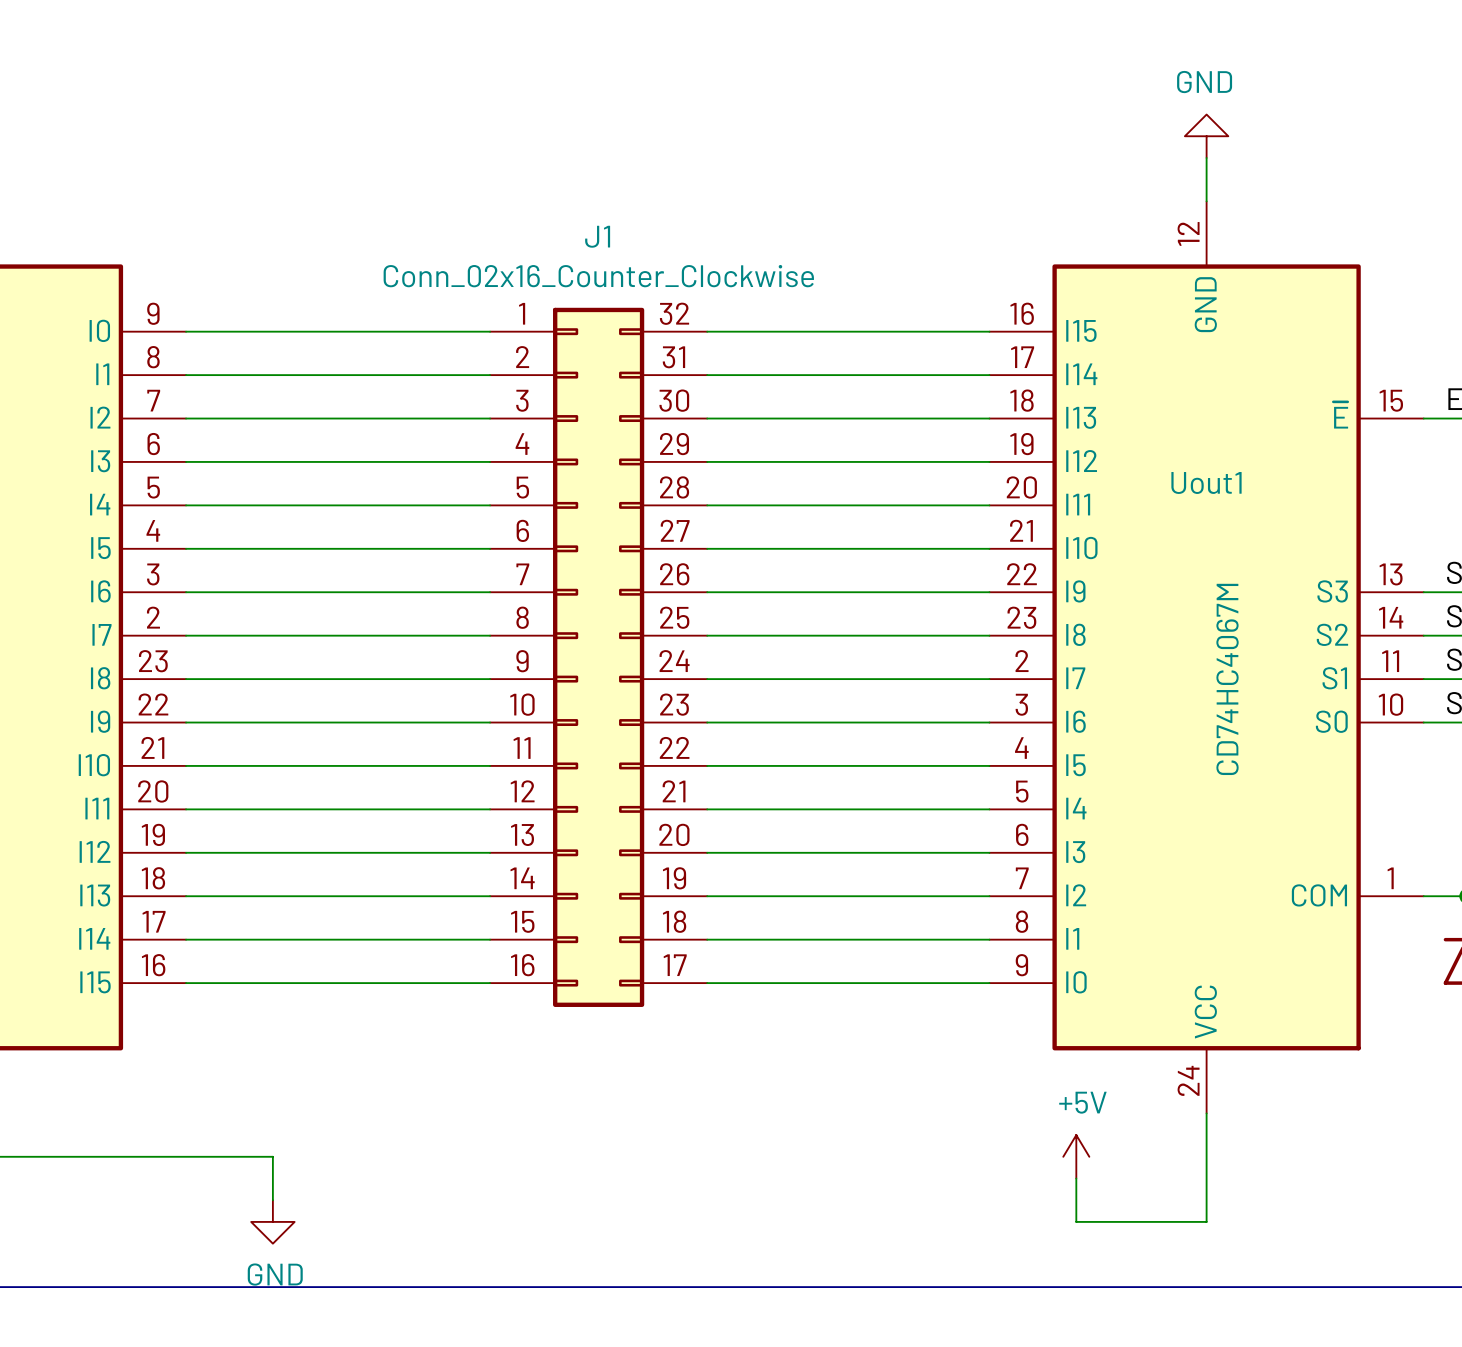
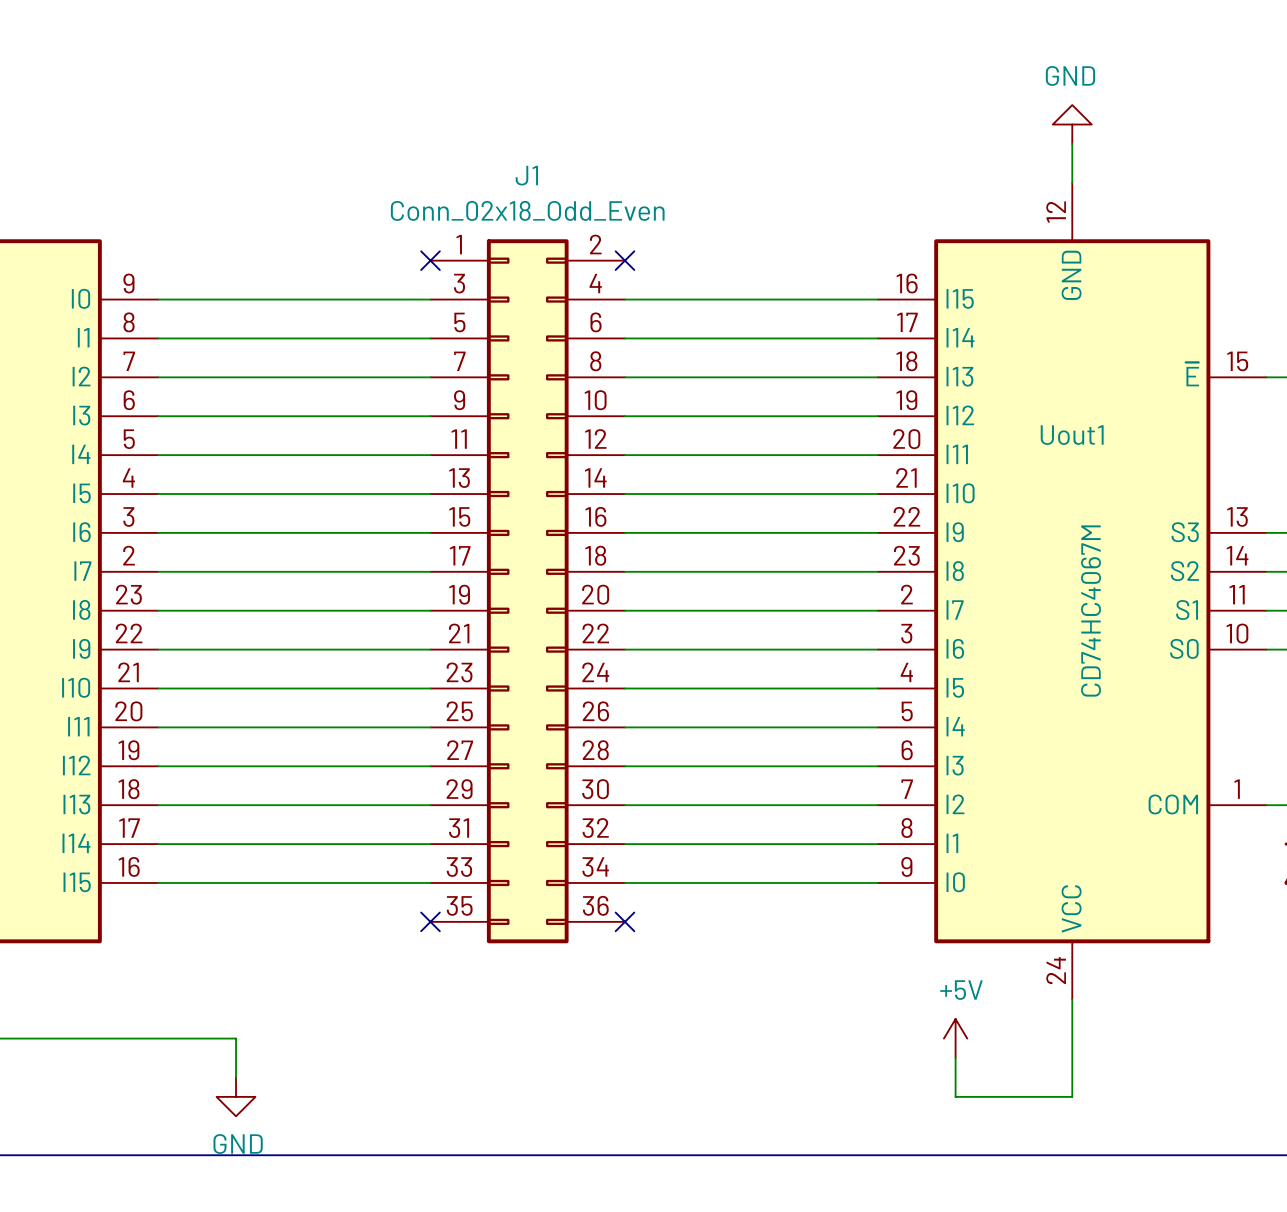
J1 name position: J1 (597, 236) -> J1 (526, 175)
J1 value: Conn_02x16_Counter_Clockwise (598, 276) -> Conn_02x18_Odd_Even (527, 210)
no-connect mark: none -> (430, 260)
no-connect mark: none -> (624, 260)
J1 symbol: [490, 307, 708, 1007] -> [430, 239, 625, 944]
no-connect mark: none -> (430, 921)
no-connect mark: none -> (624, 921)

